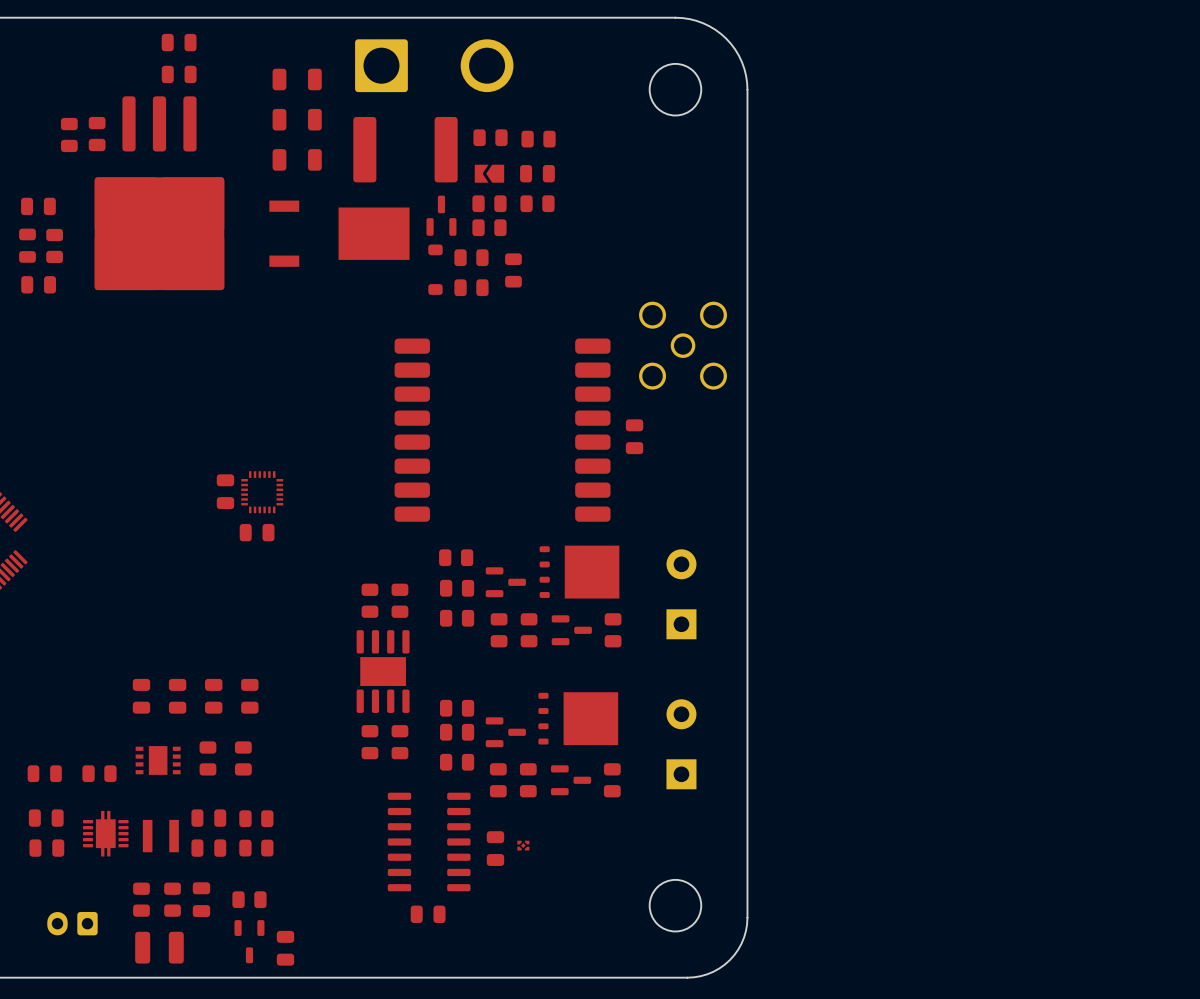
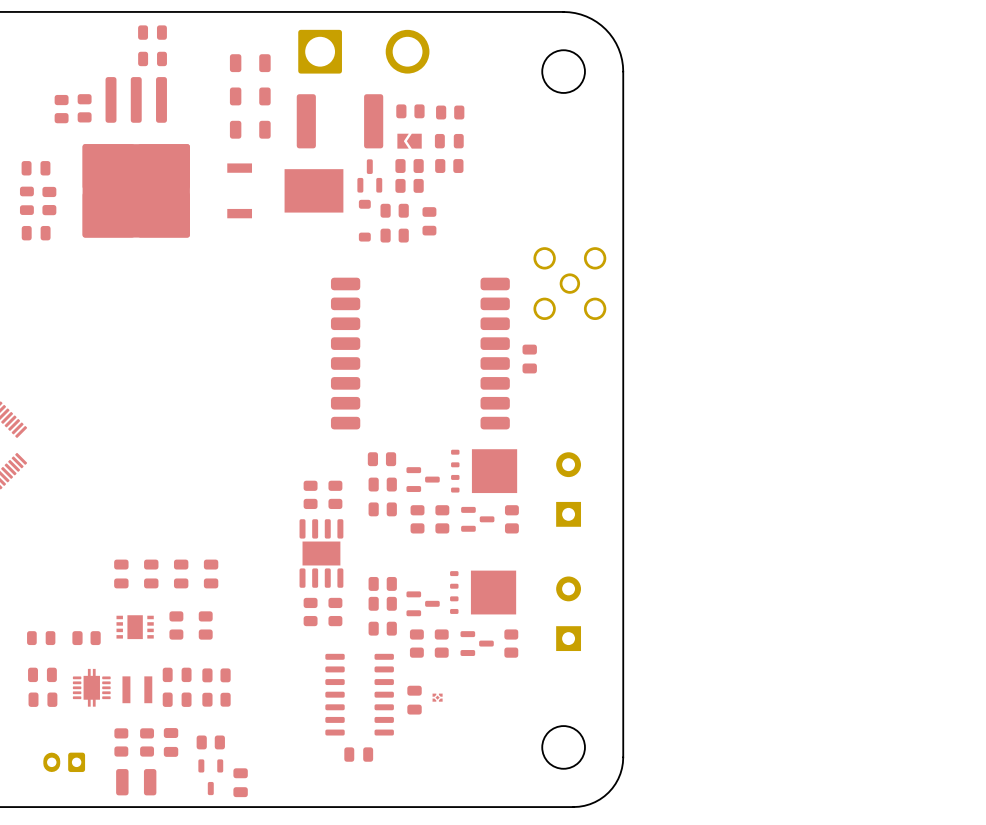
part: (225, 491) -> none
part: (262, 492) -> none
part: (257, 532) -> none

